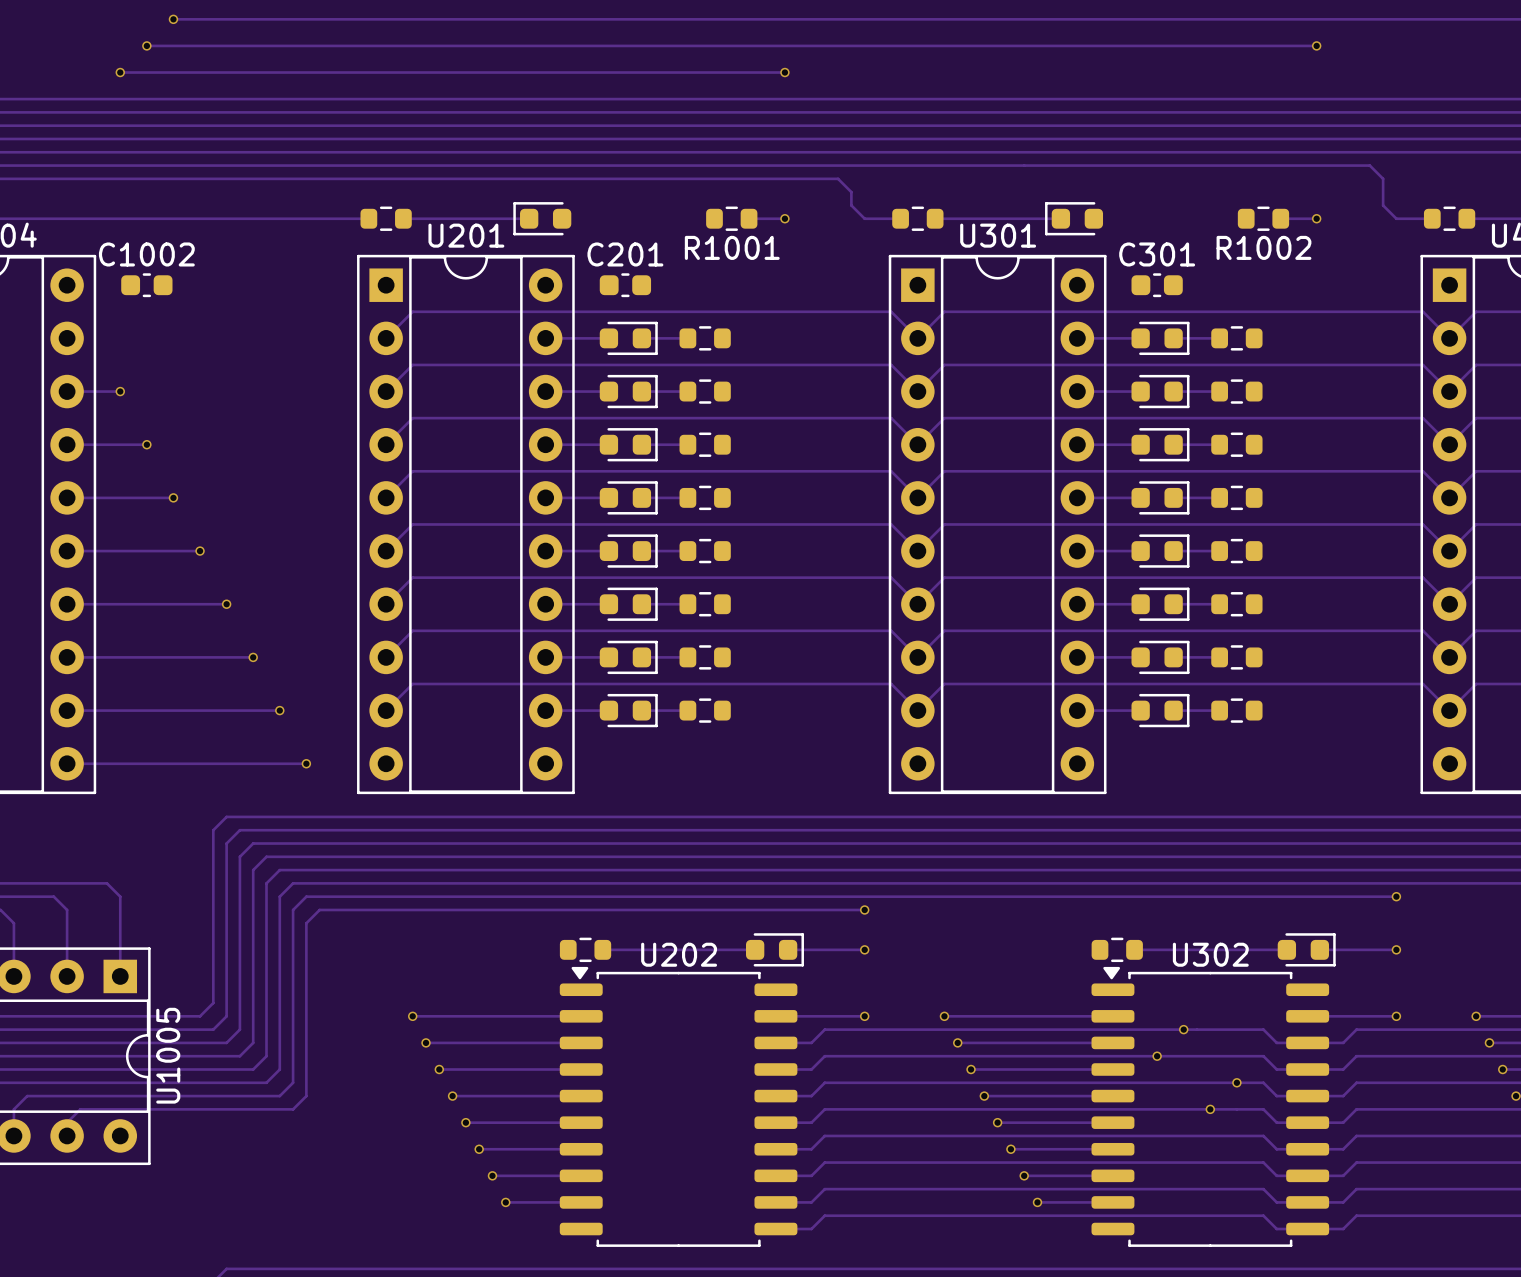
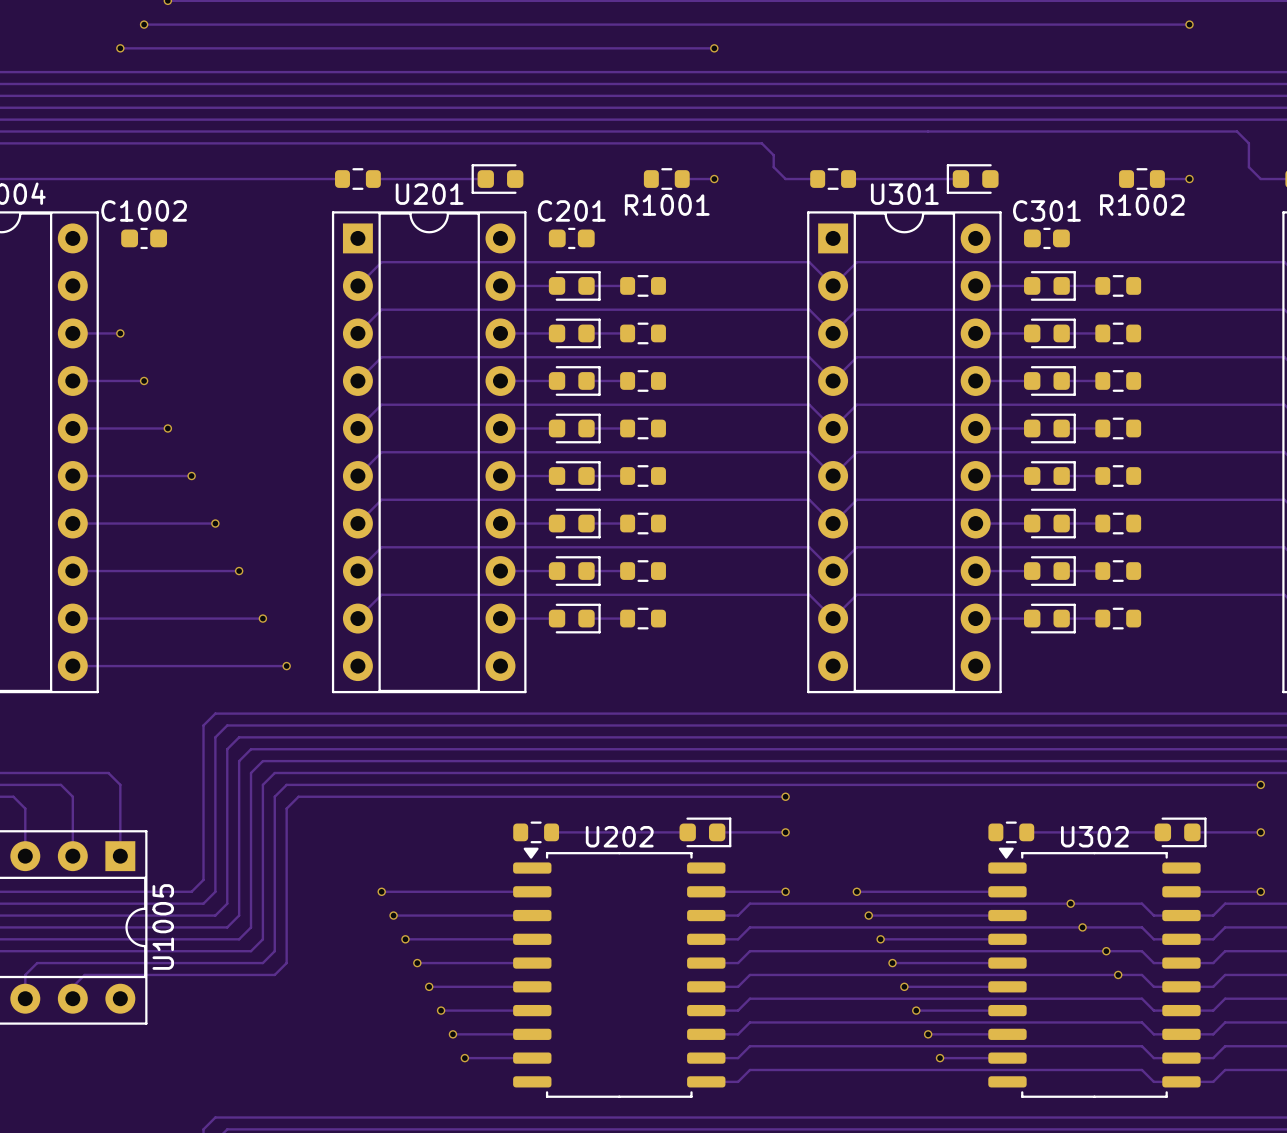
via: (1157, 1056) -> none
via: none -> (1082, 927)
via: none -> (1106, 951)
via: (1236, 1082) -> none
via: (1210, 1109) -> none
via: none -> (1118, 974)

